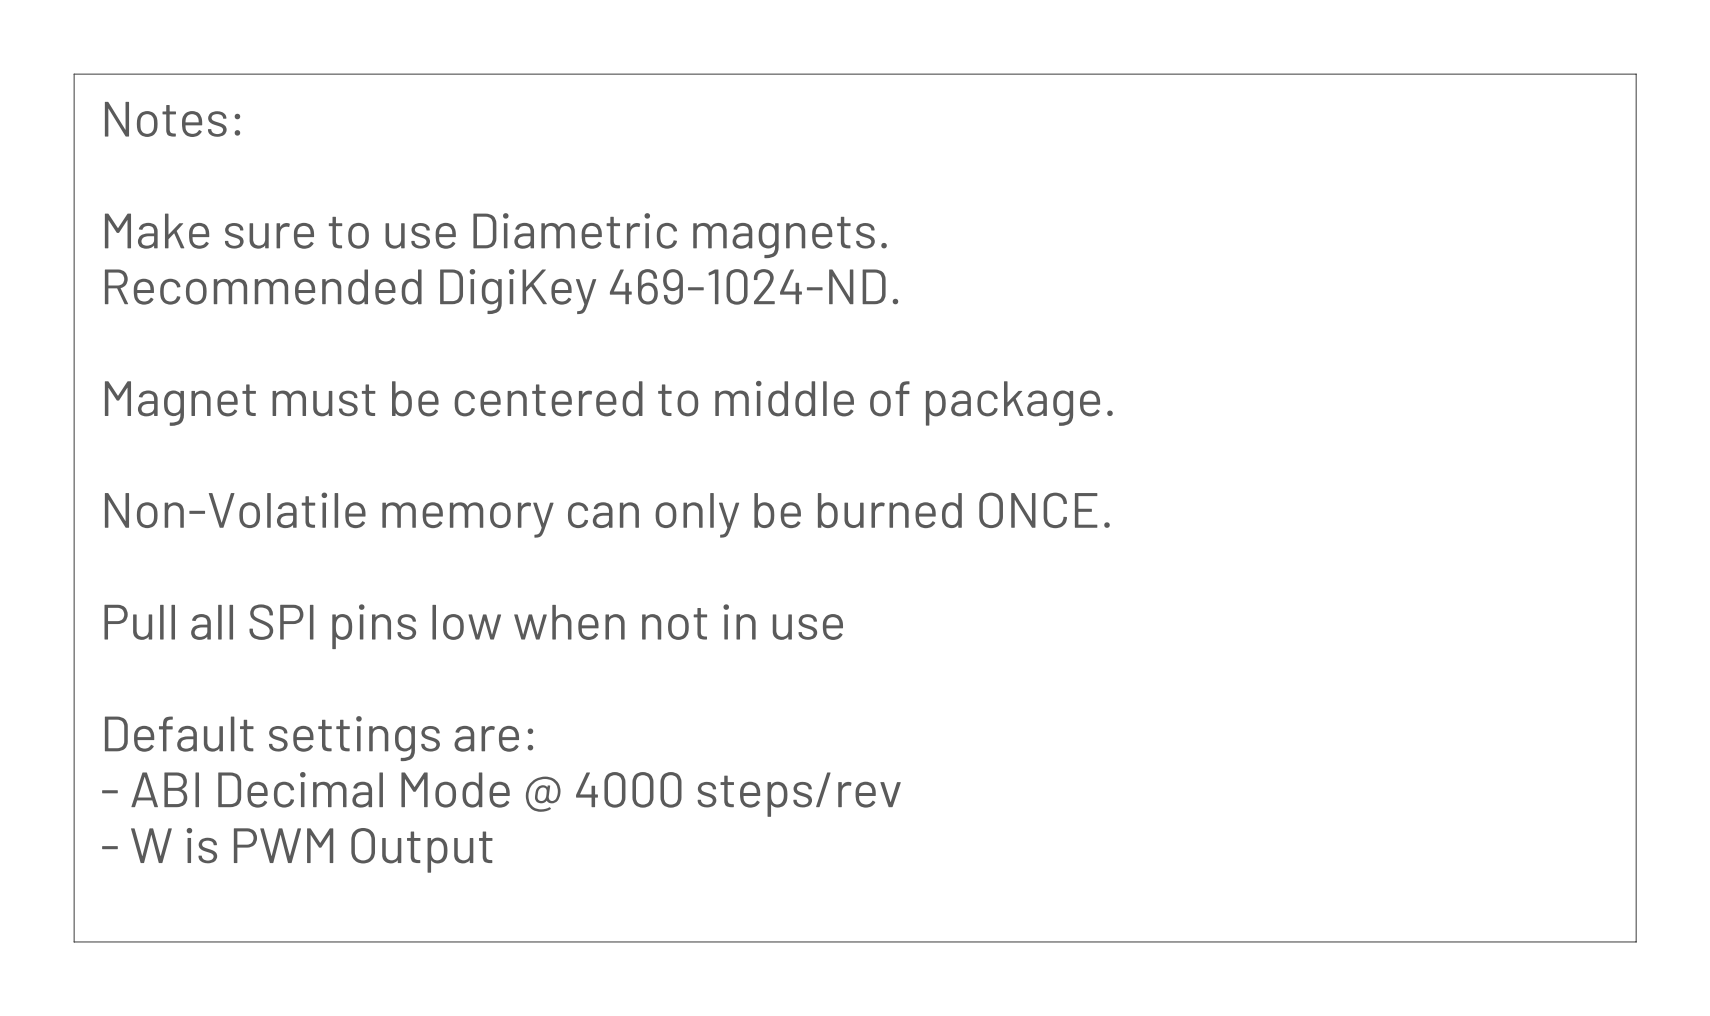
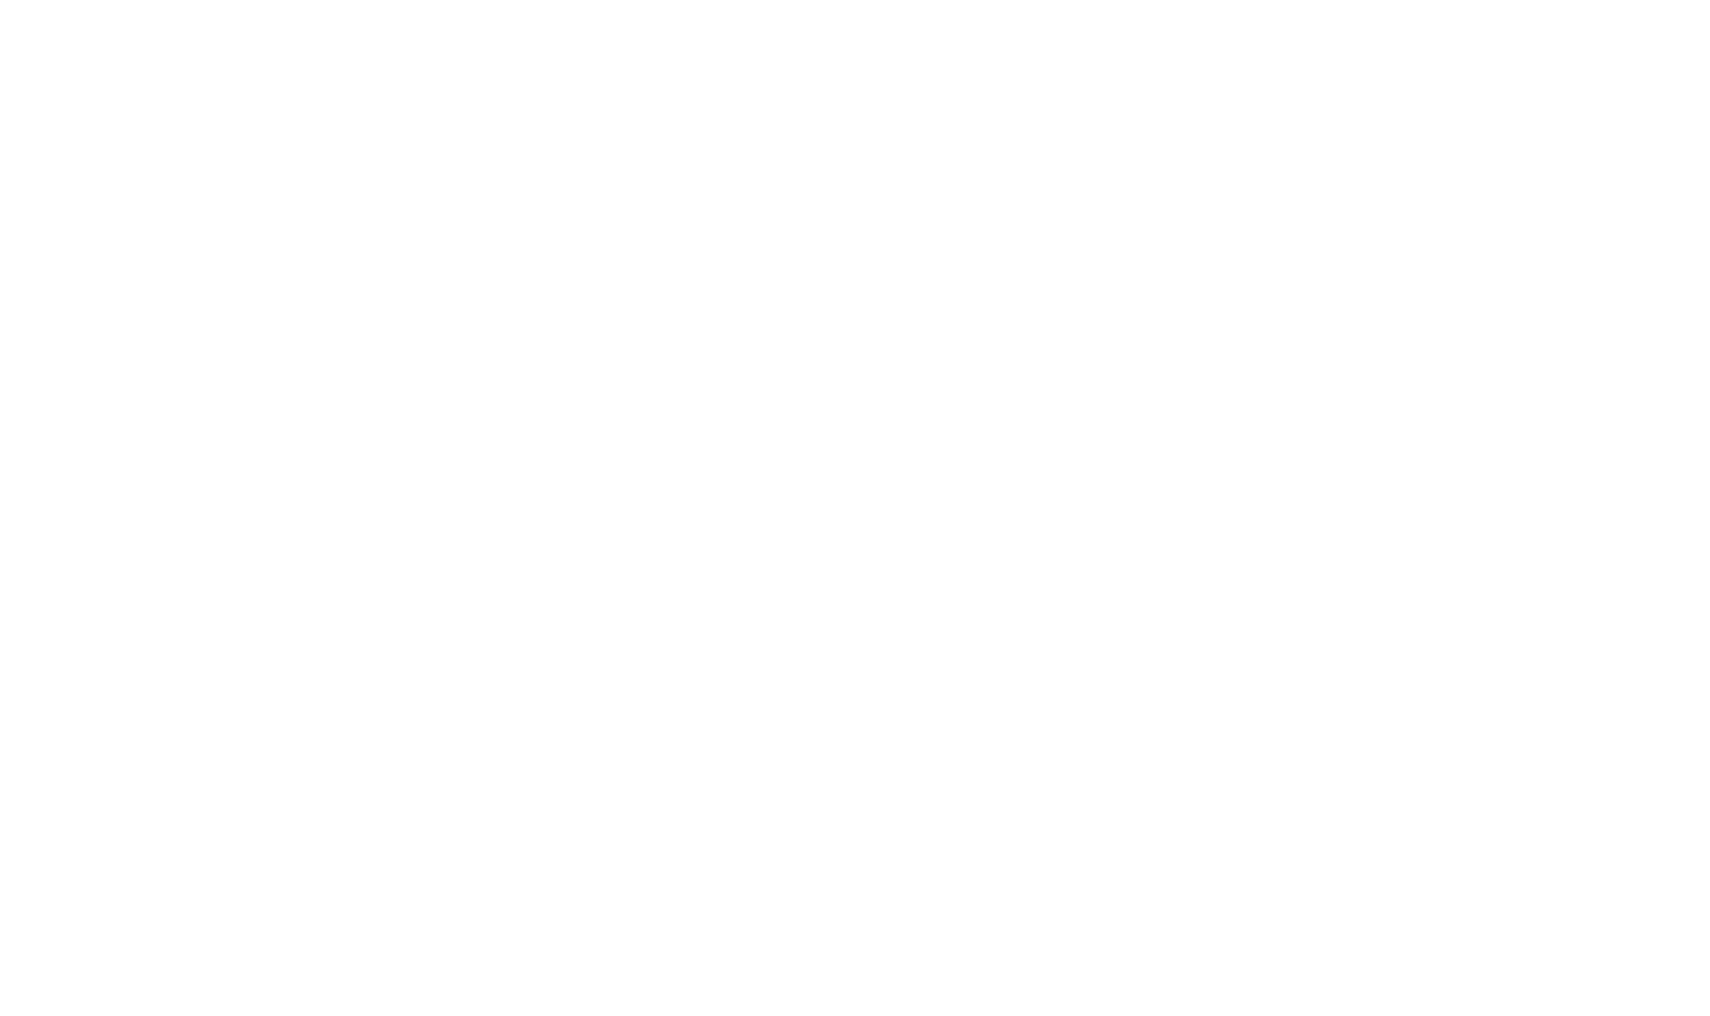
line: (74, 74) (1636, 74) (1636, 941) (74, 941) (74, 74) -> none
text: Notes: (172, 119) -> none
text: Make sure to use Diametric magnets. (495, 235) -> none
text: Recommended DigiKey 469-1024-ND. (501, 291) -> none
text: Magnet must be centered to middle of package. (608, 403) -> none
text: Non-Volatile memory can only be burned ONCE. (607, 515) -> none
text: Pull all SPI pins low when not in use (473, 626) -> none
text: Default settings are: (319, 738) -> none
text: - ABI Decimal Mode @ 4000 steps/rev (501, 794) -> none
text: - W is PWM Output (297, 850) -> none

